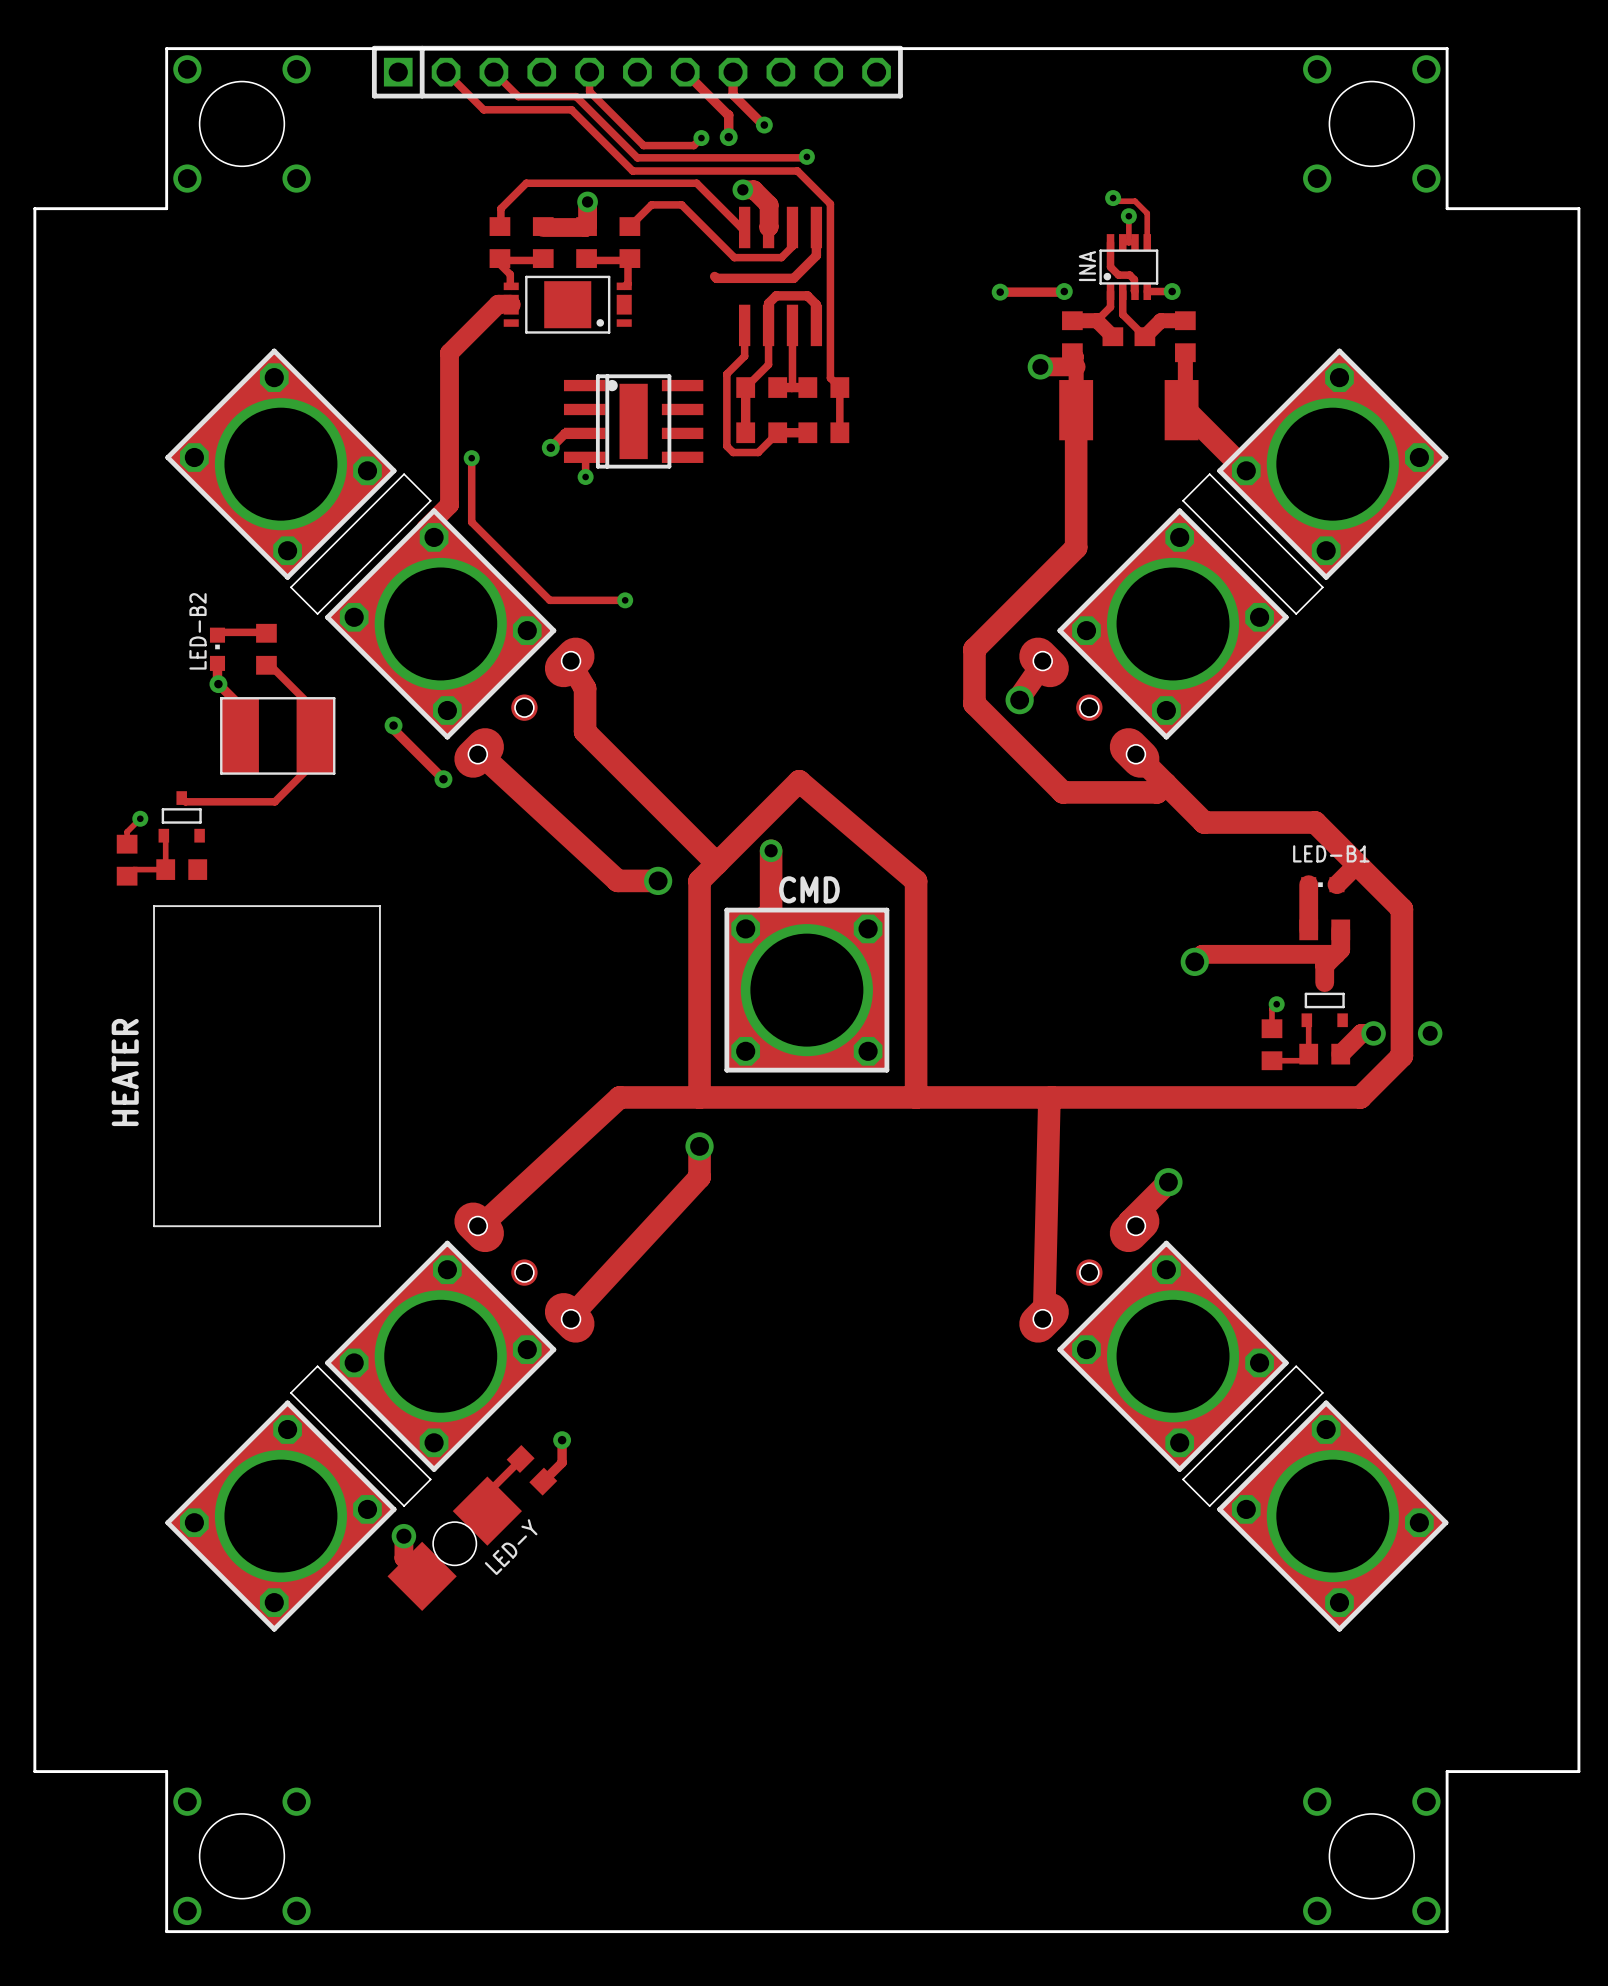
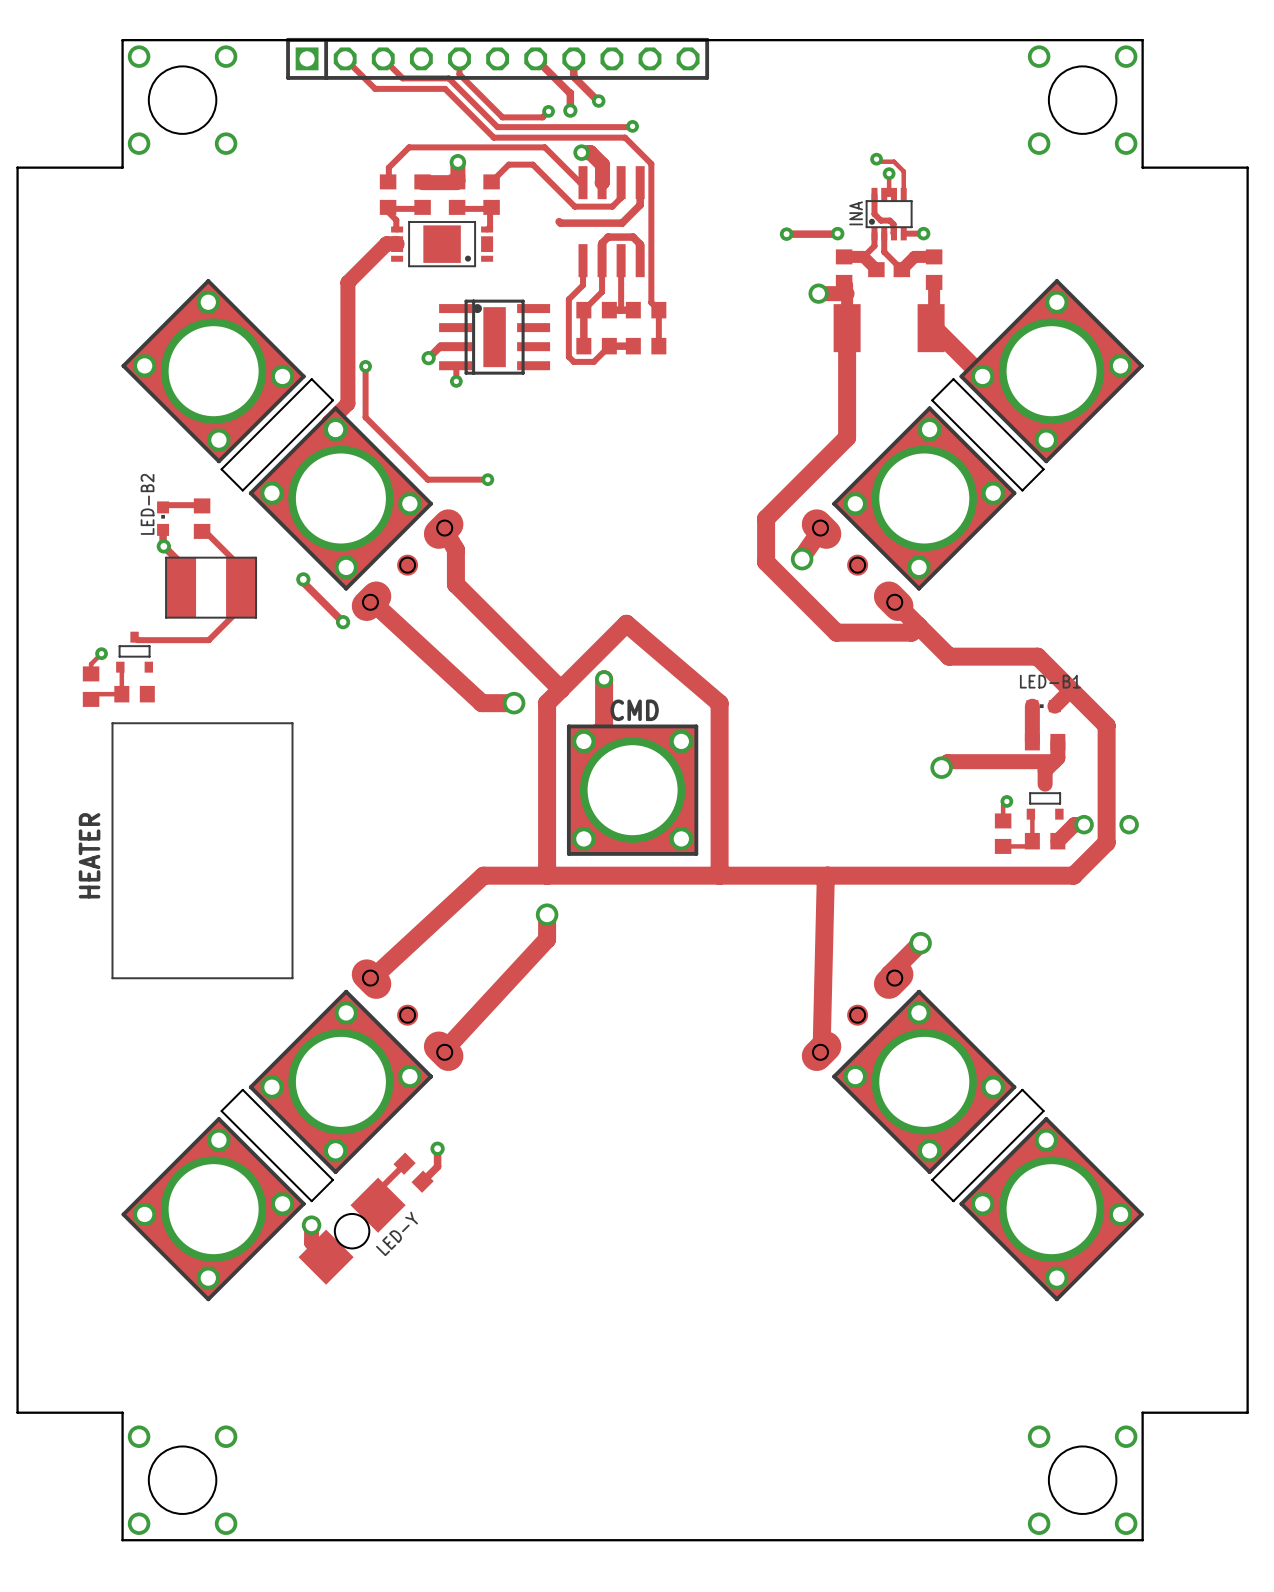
part footprint: [454, 637, 595, 778] -> [351, 509, 464, 622]
part footprint: [1019, 637, 1160, 778] -> [801, 509, 914, 622]
part footprint: [454, 1202, 595, 1343] -> [351, 959, 464, 1072]
part footprint: [1019, 1202, 1160, 1343] -> [801, 959, 914, 1072]

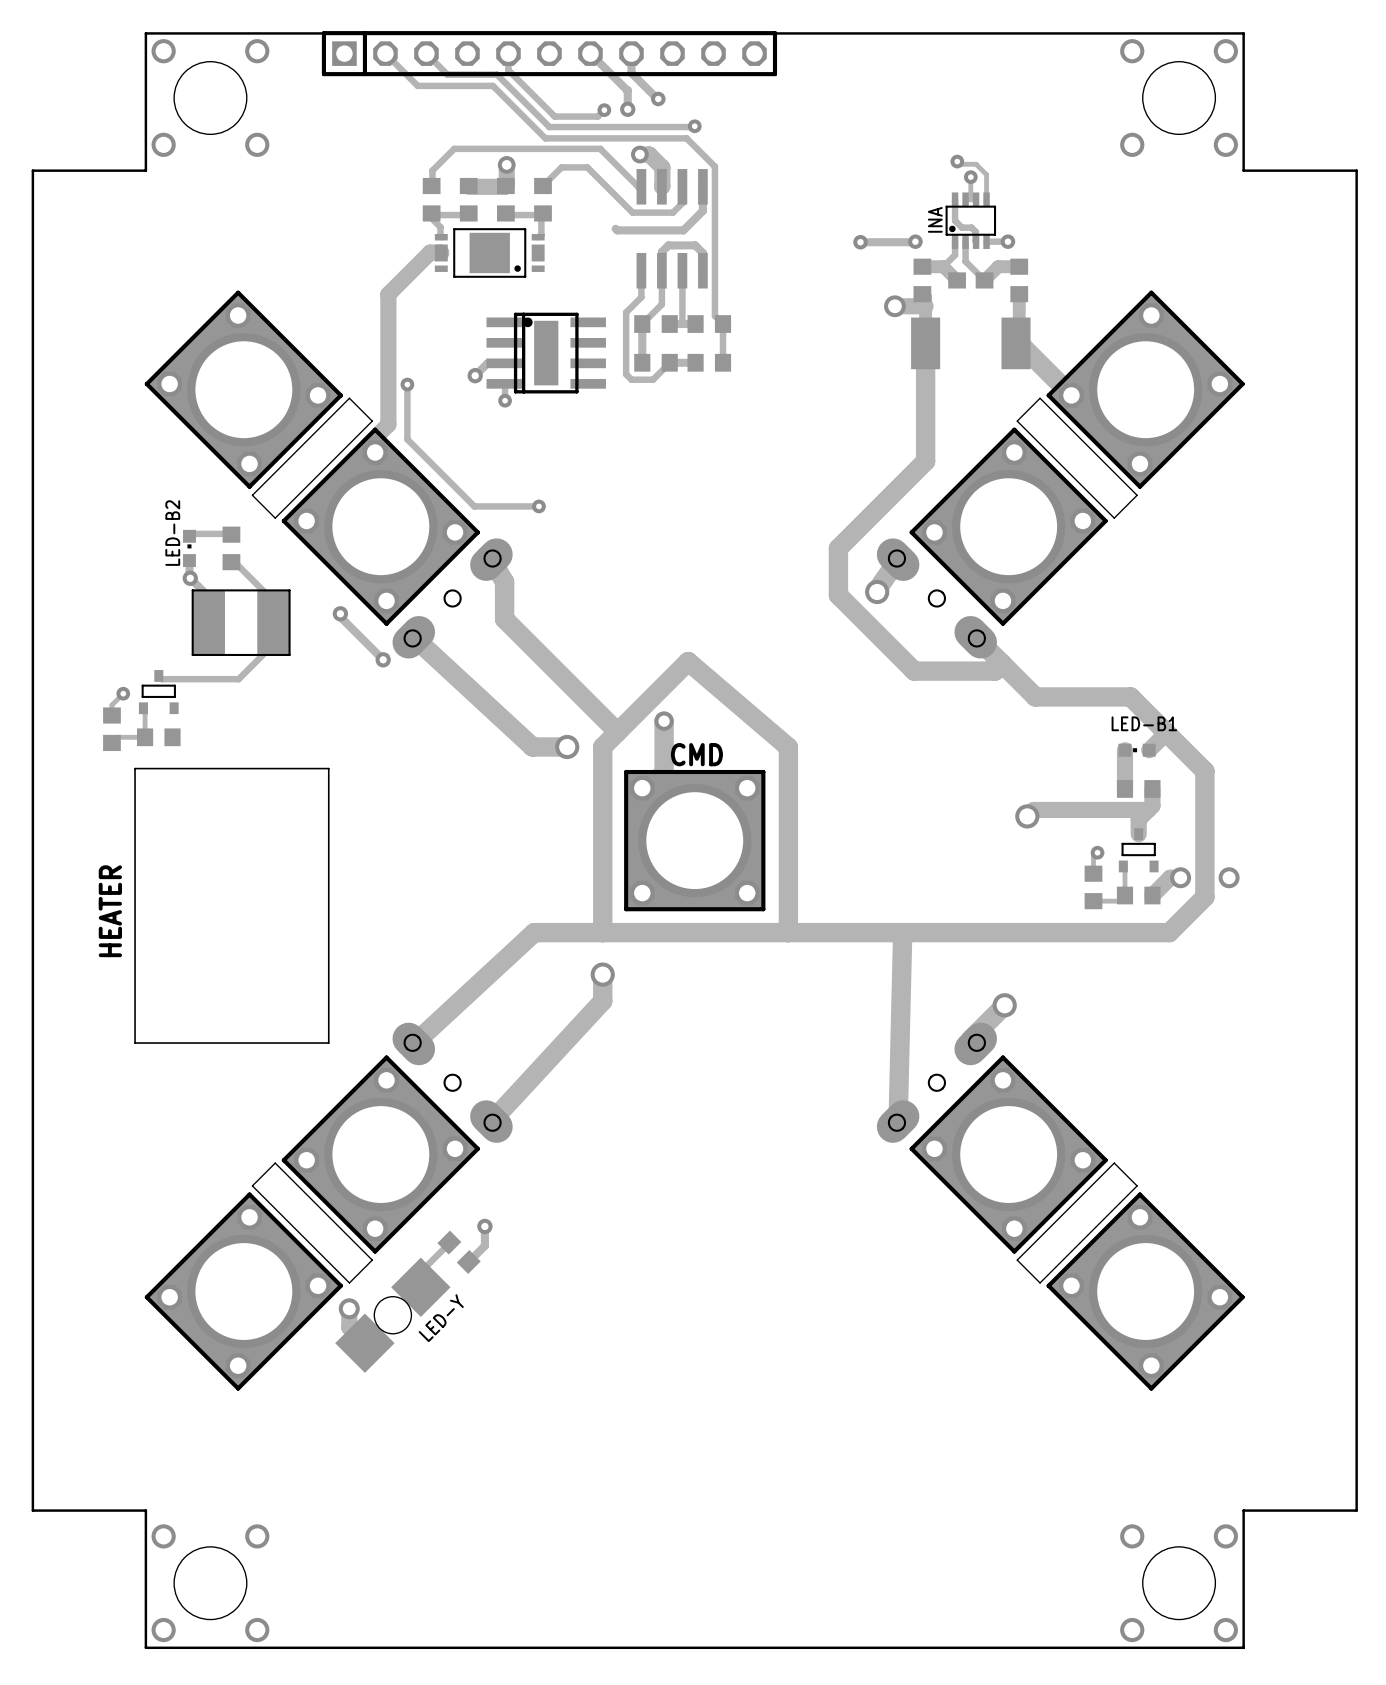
part footprint: [351, 509, 464, 622] -> [392, 538, 513, 659]
part footprint: [801, 509, 914, 622] -> [876, 538, 998, 659]
part footprint: [351, 959, 464, 1072] -> [392, 1022, 513, 1143]
part footprint: [801, 959, 914, 1072] -> [876, 1022, 998, 1143]

